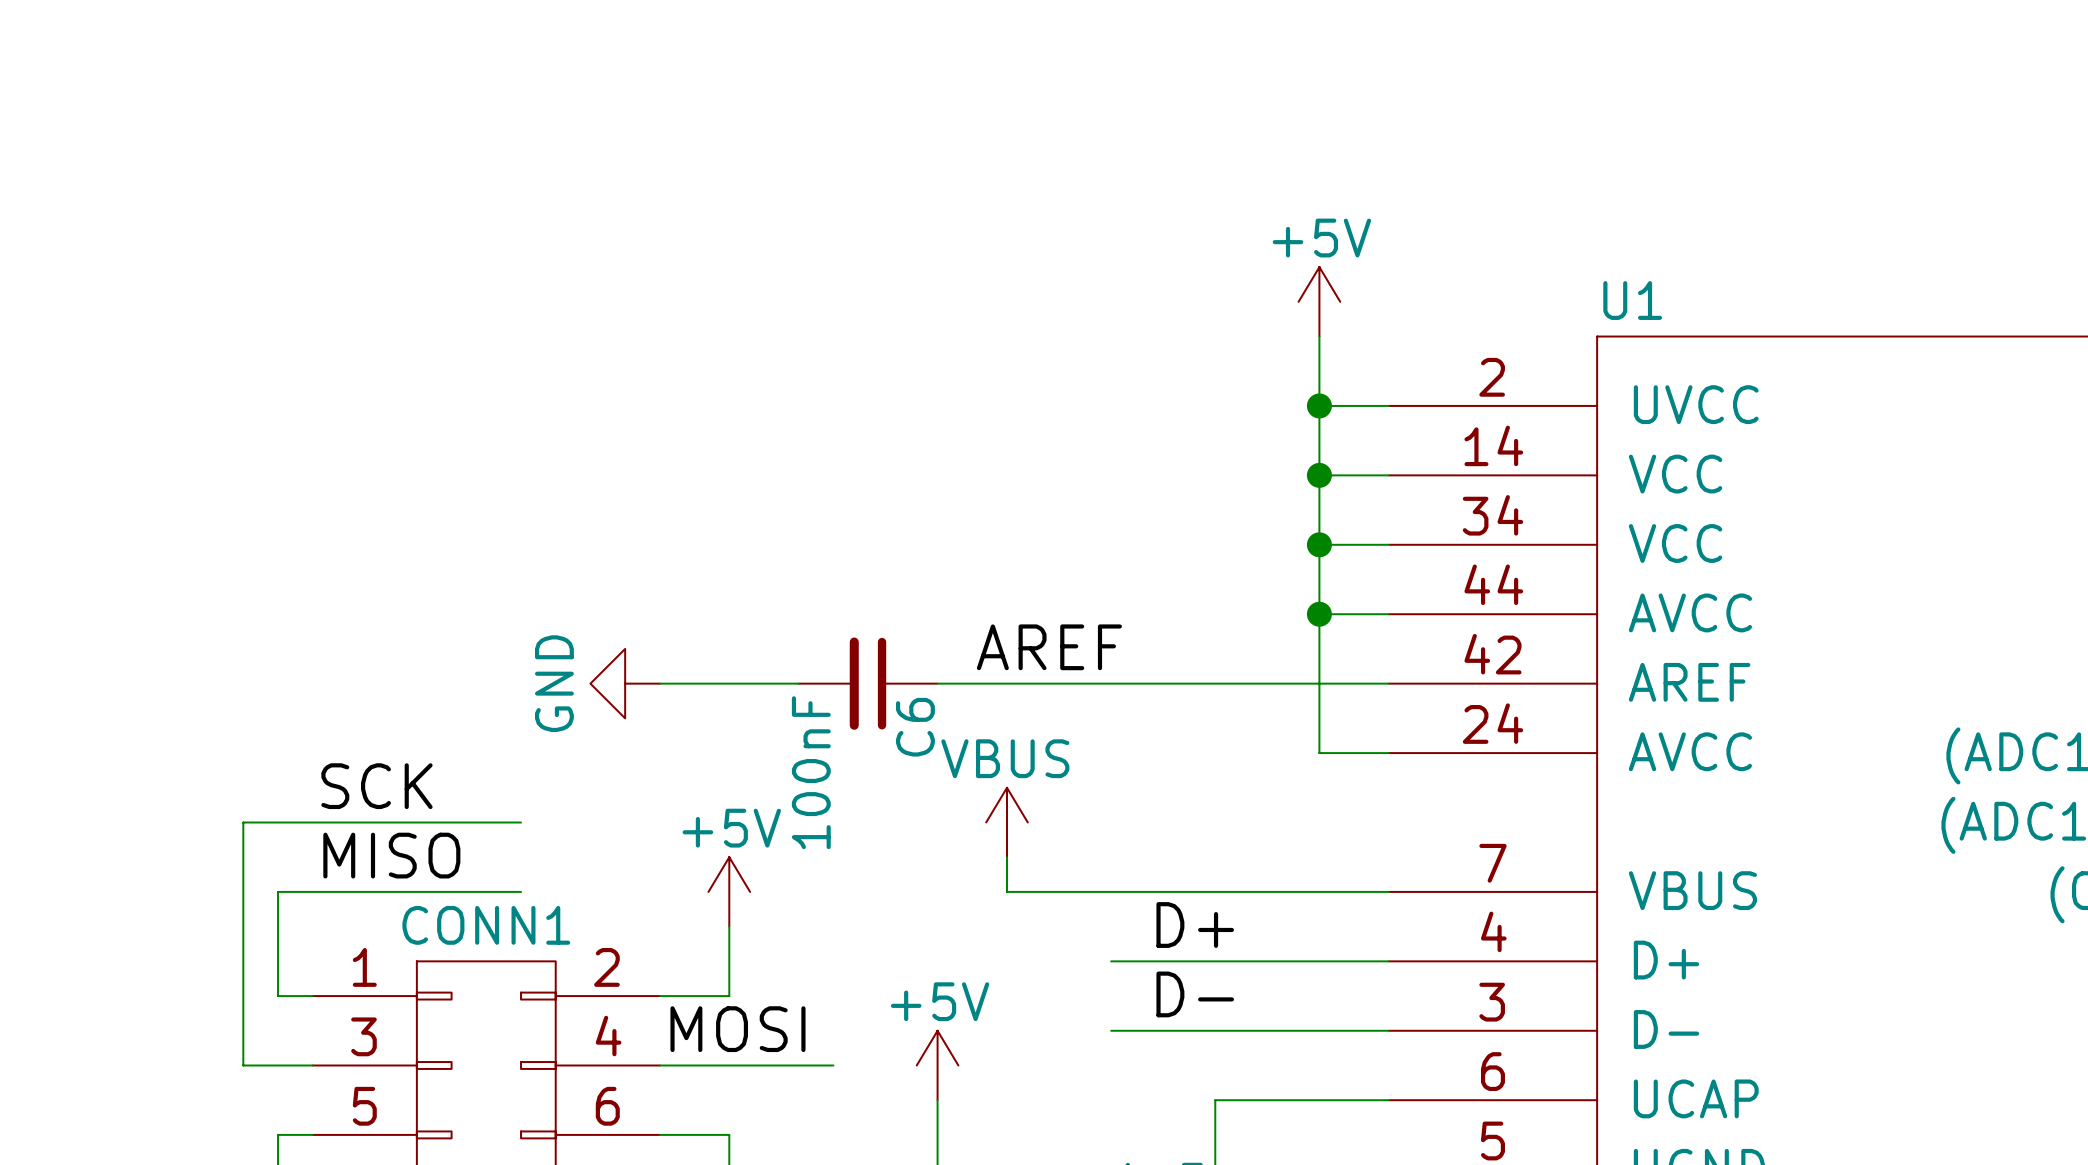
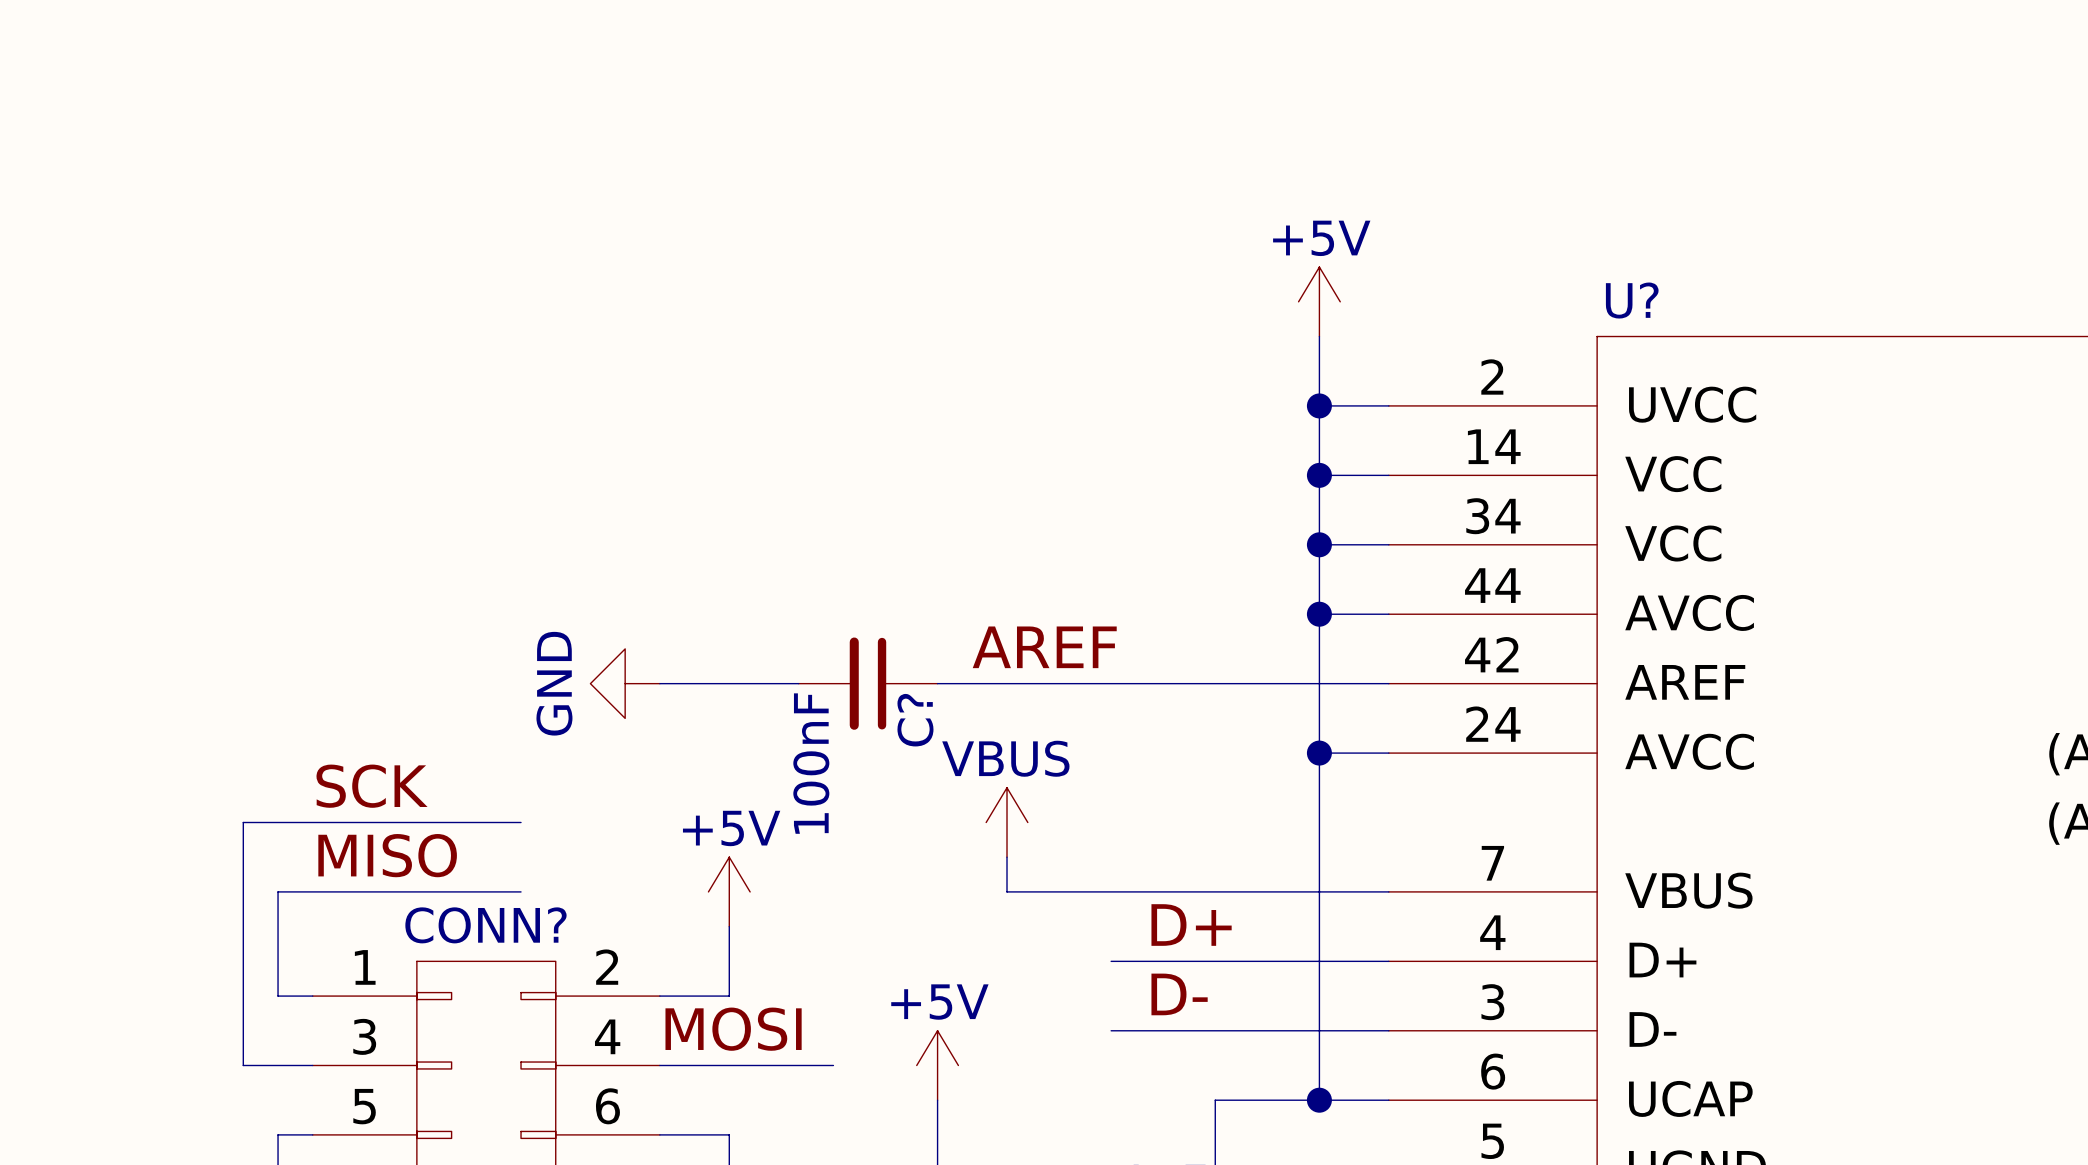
U1 name: U1 (1632, 300) -> U? (1632, 300)
C6 name: C6 (915, 727) -> C? (915, 720)
wire: none -> (1319, 753) (1319, 1100)
junction: none -> (1319, 753)
CONN1 name: CONN1 (486, 925) -> CONN? (485, 925)
junction: none -> (1319, 1100)

